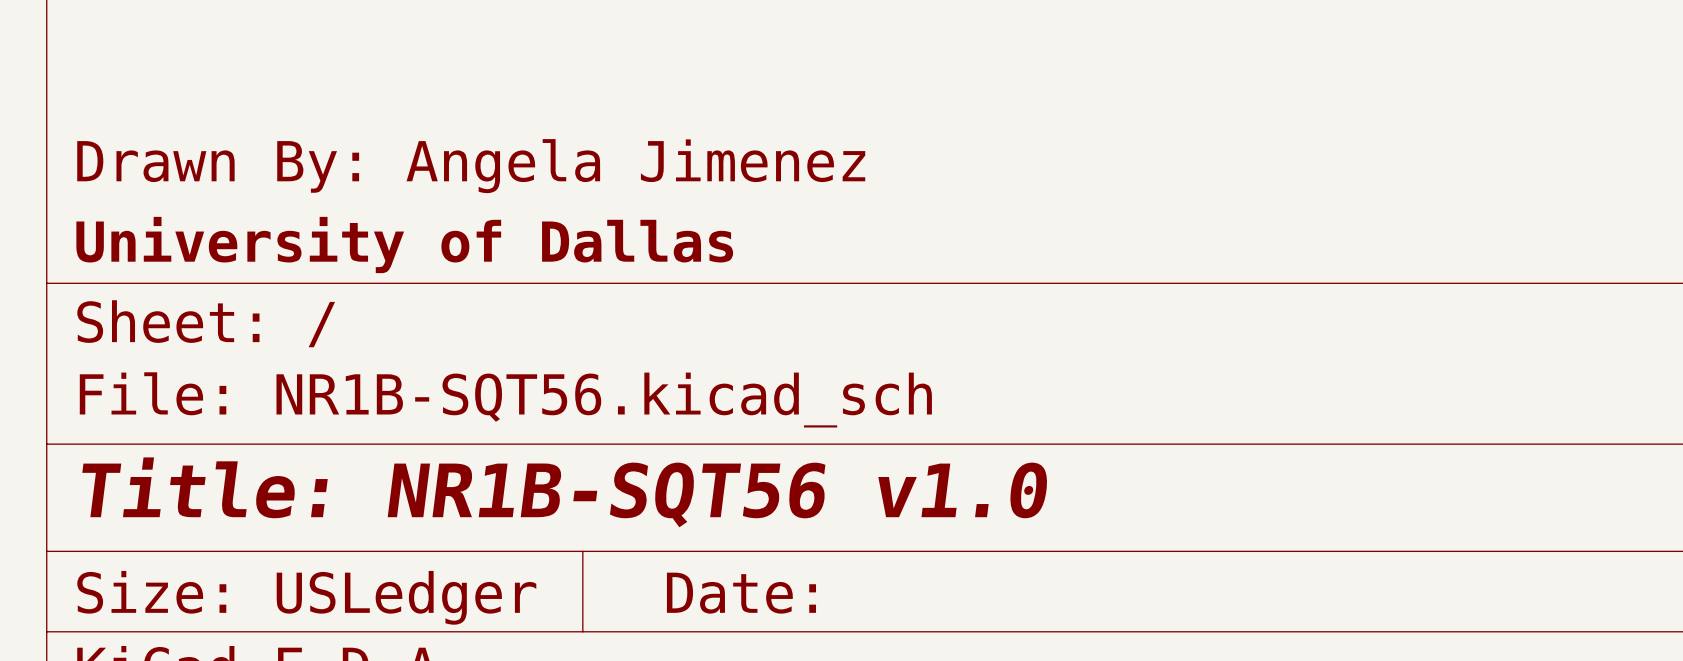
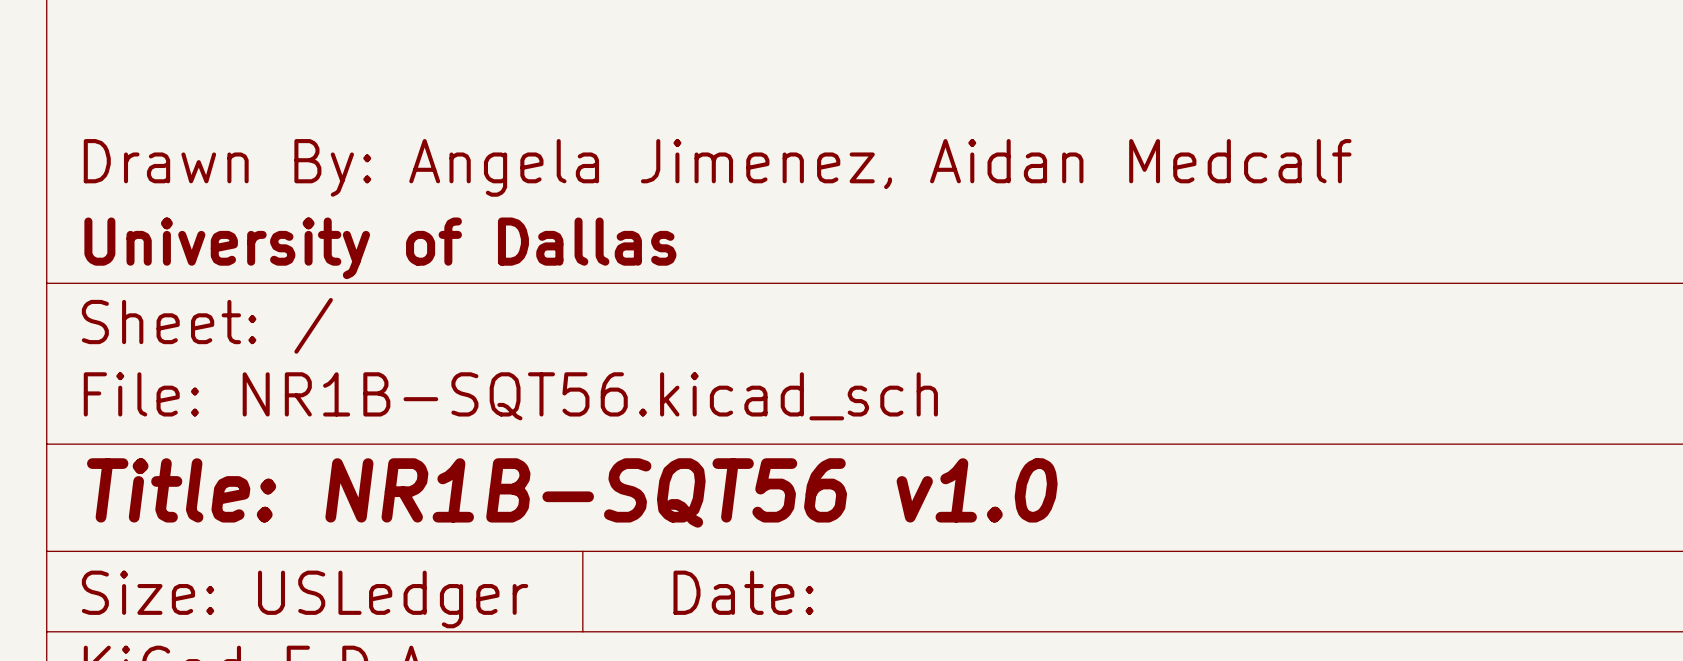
title block: Drawn By: Angela Jimenez (471, 166) -> Drawn By: Angela Jimenez, Aidan Medcalf (717, 167)

